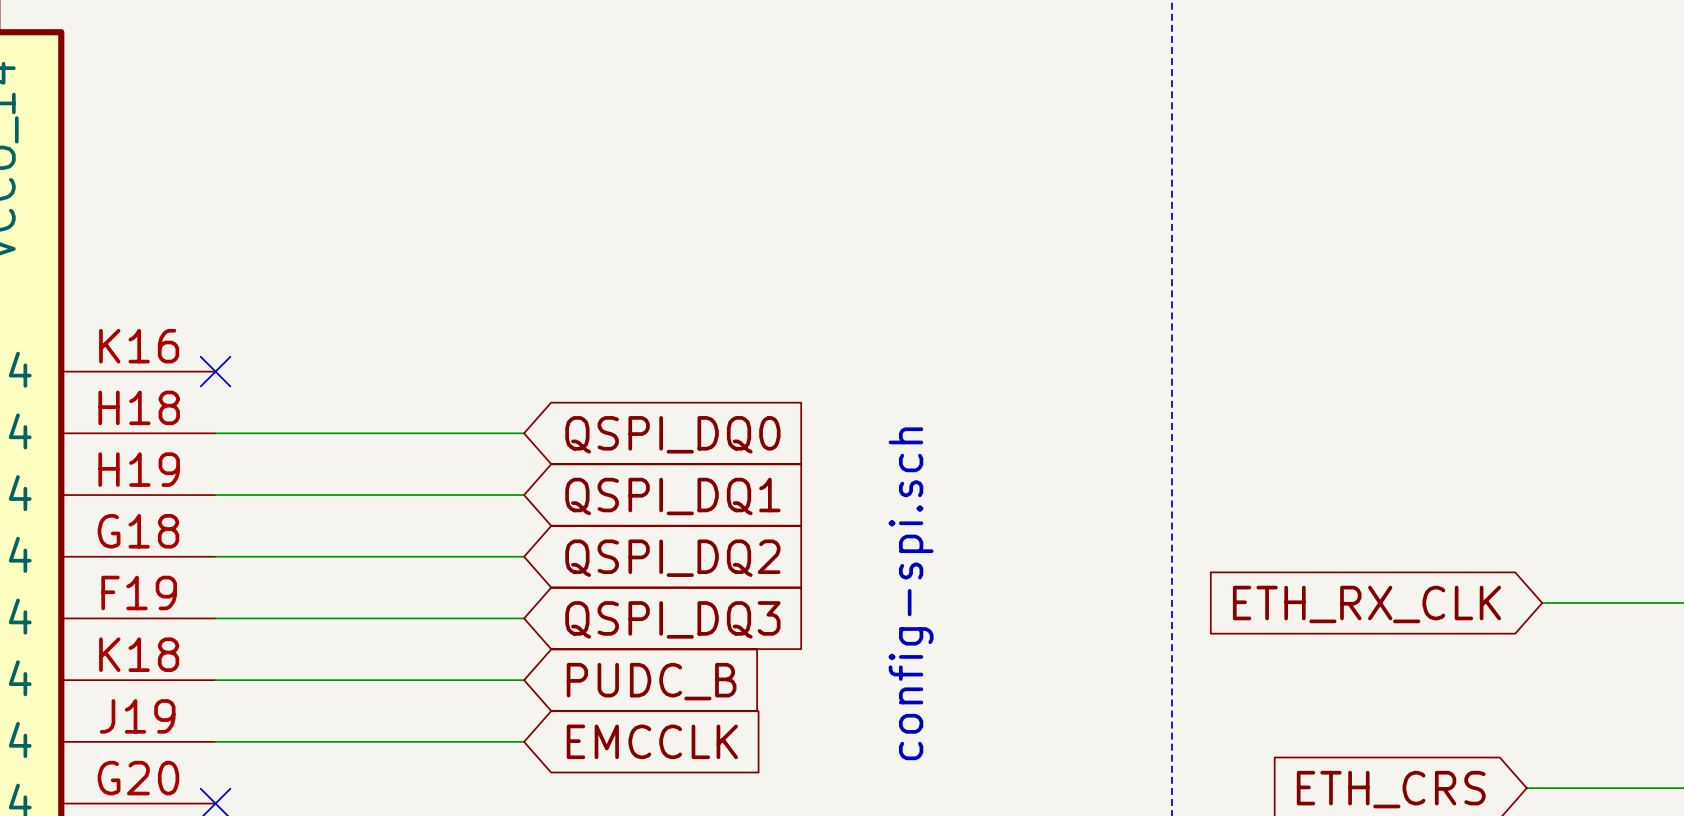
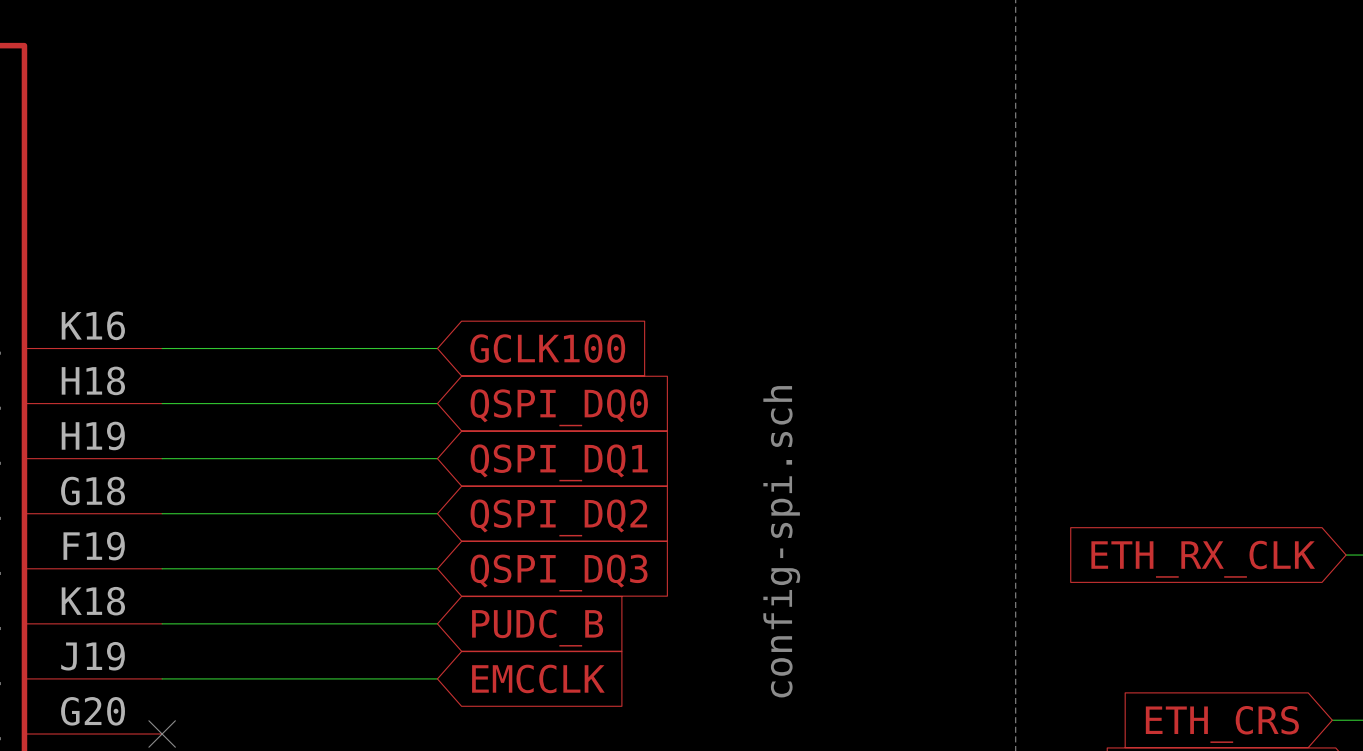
wire: none -> (162, 348) (437, 348)
no-connect mark: (215, 371) -> none
global label: none -> GCLK100 (547, 348)

